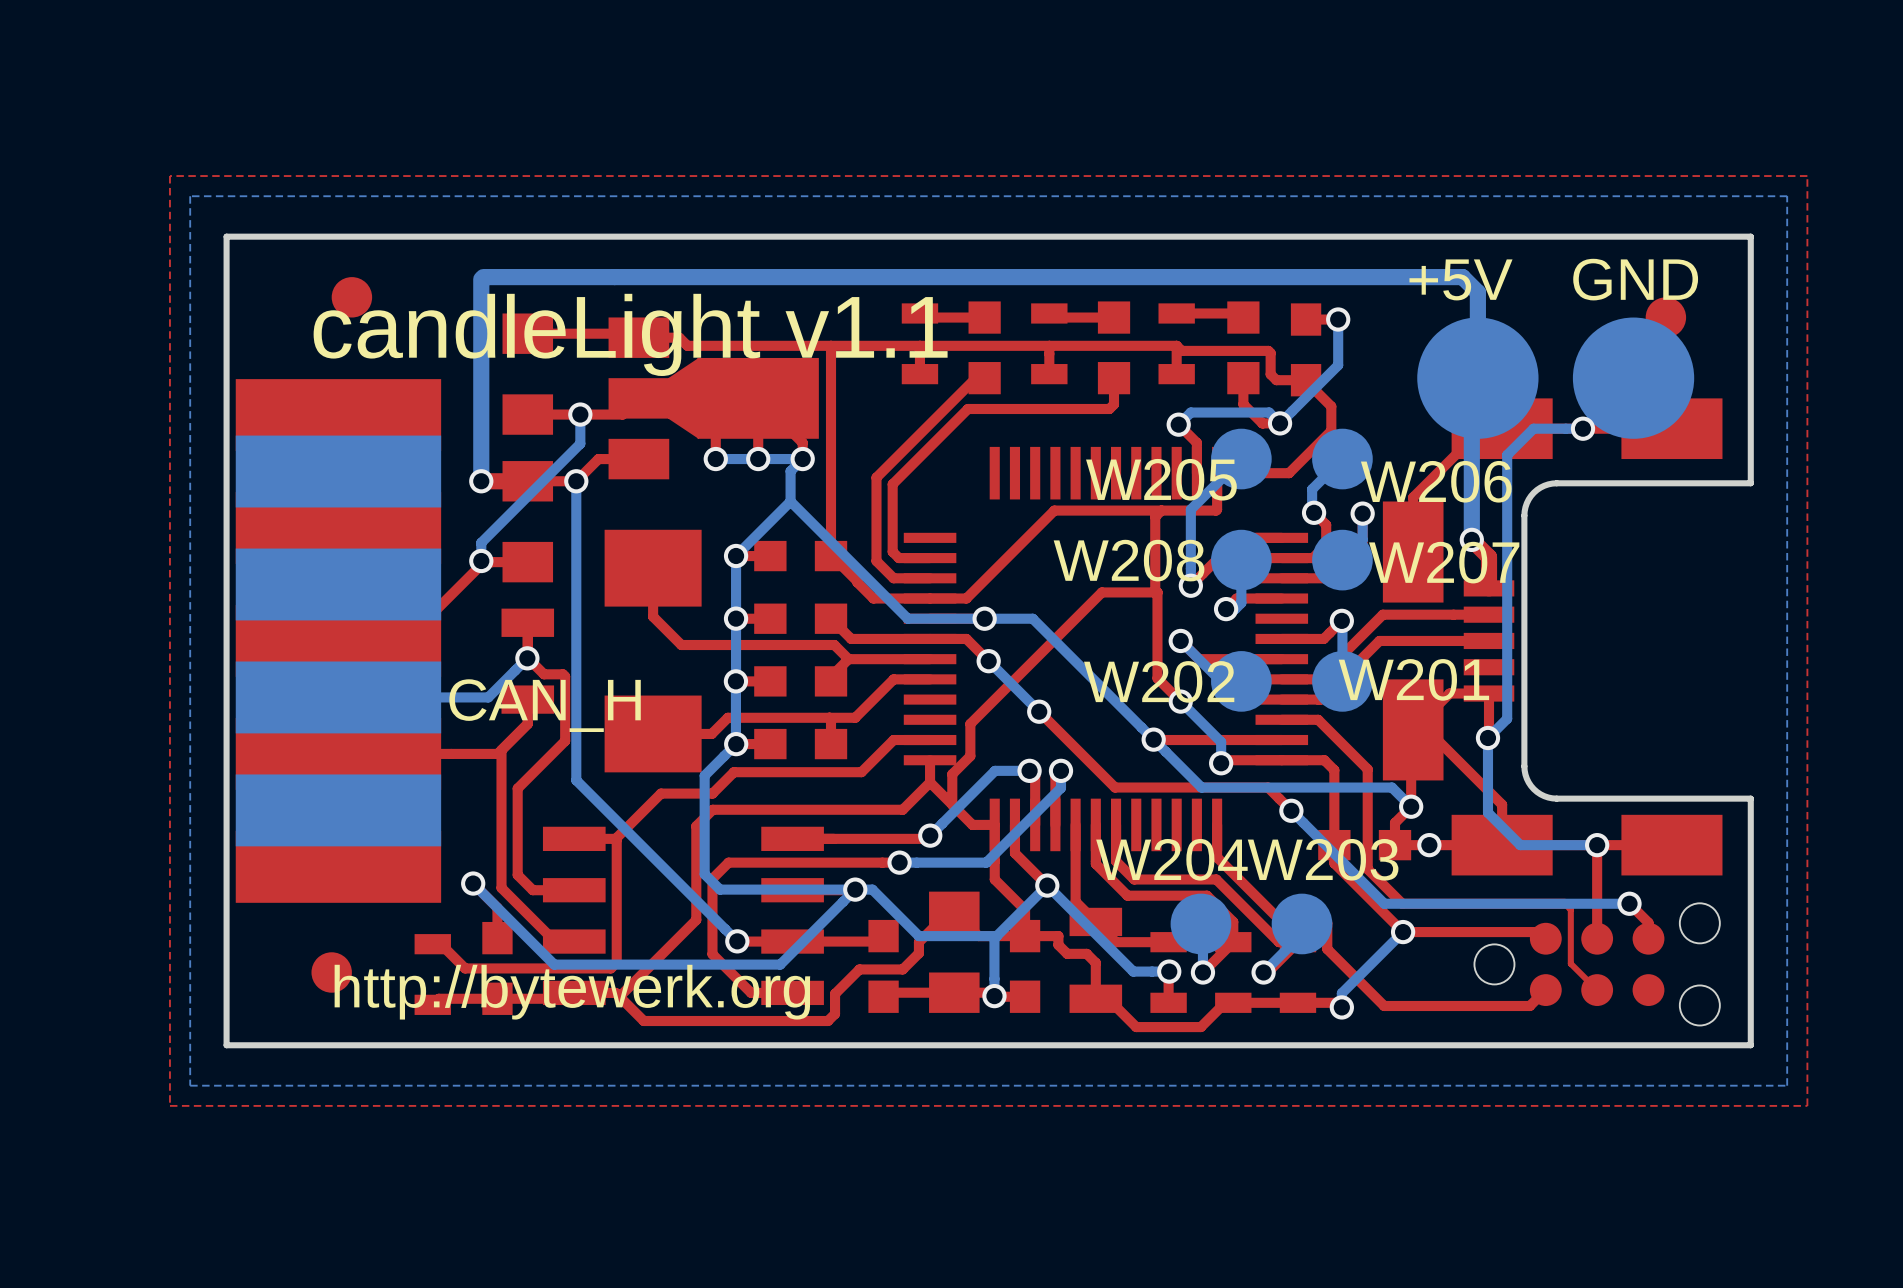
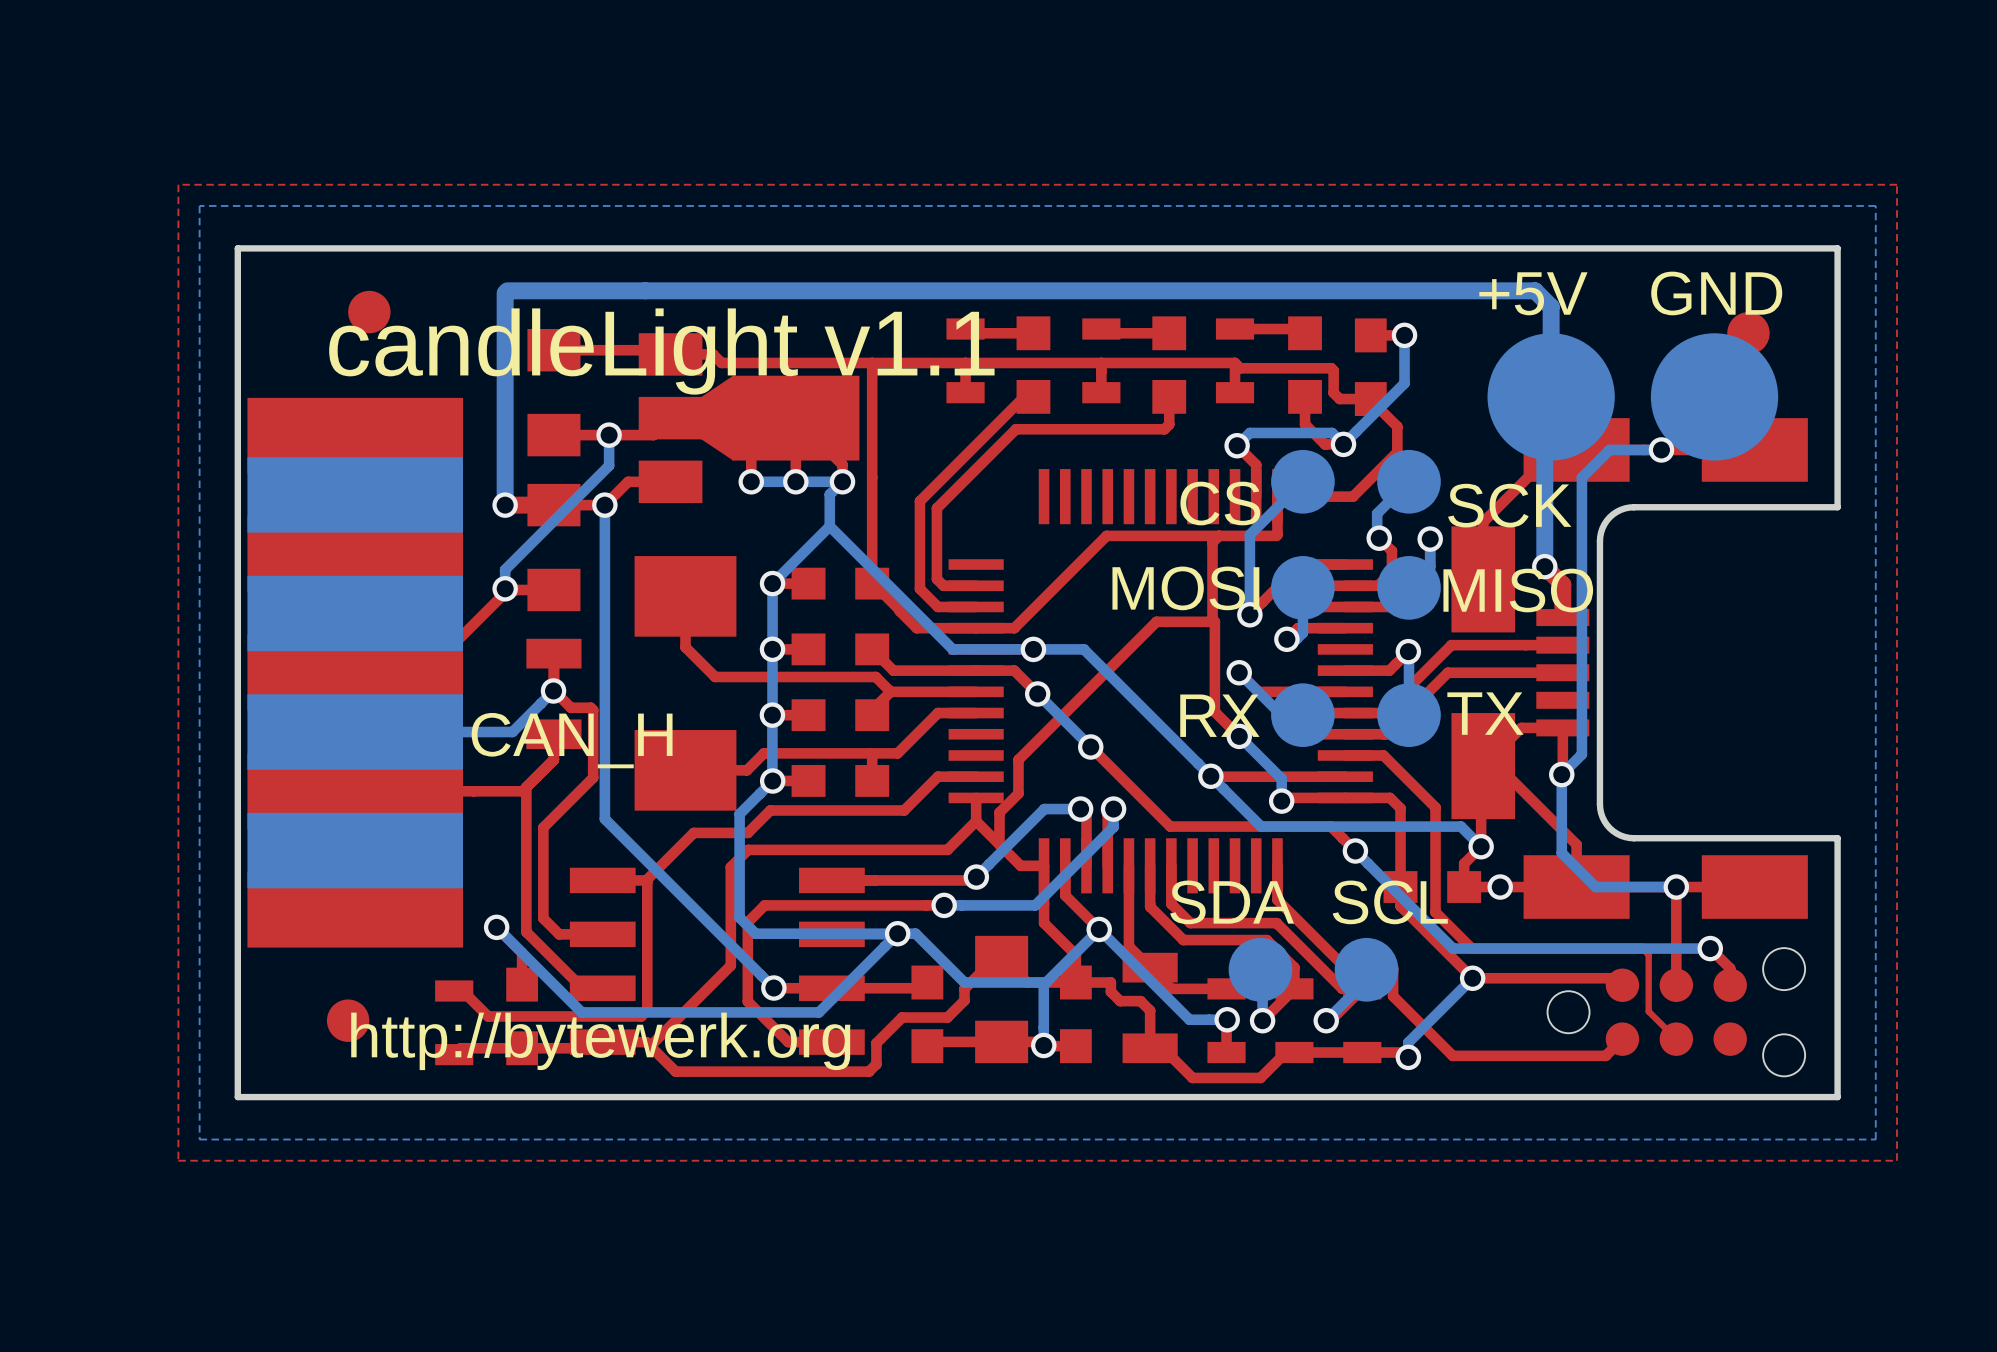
W205 name: W205 (1161, 479) -> CS (1220, 503)
W206 name: W206 (1436, 481) -> SCK (1509, 505)
W208 name: W208 (1129, 560) -> MOSI (1185, 588)
W207 name: W207 (1444, 562) -> MISO (1518, 590)
W201 name: W201 (1413, 679) -> TX (1485, 713)
W202 name: W202 (1159, 681) -> RX (1219, 715)
W204 name: W204 (1171, 859) -> SDA (1232, 902)
W203 name: W203 (1323, 859) -> SCL (1390, 902)

